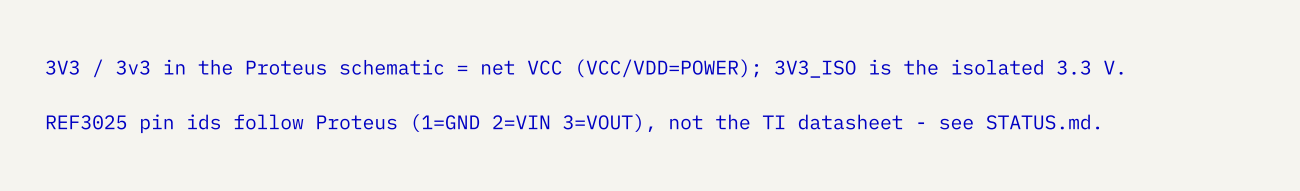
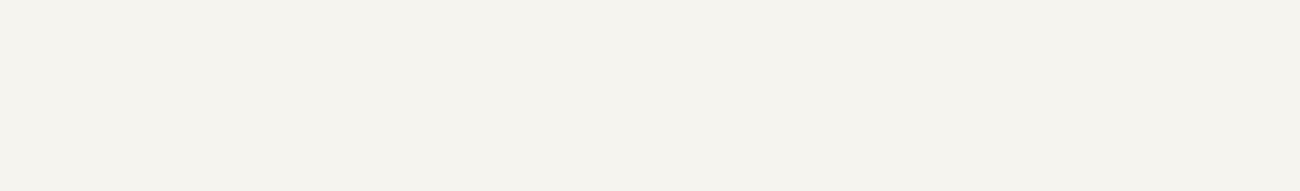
text: 3V3 / 3v3 in the Proteus schematic = net VCC (VCC/VDD=POWER); 3V3_ISO is the isolated 3.3 V. (584, 68) -> none
text: REF3025 pin ids follow Proteus (1=GND 2=VIN 3=VOUT), not the TI datasheet - see STATUS.md. (572, 123) -> none

